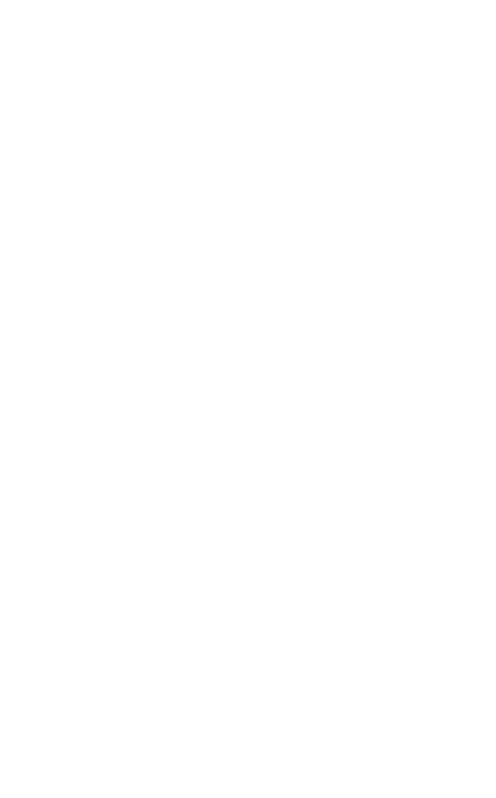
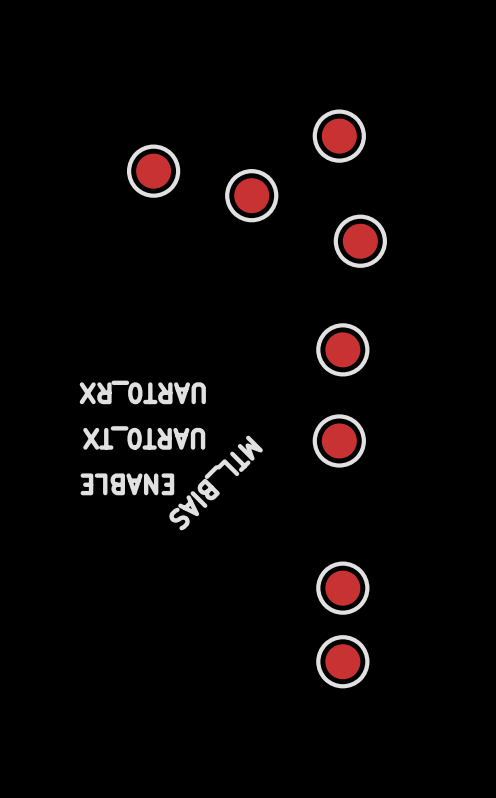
part: none -> (339, 136)
part: none -> (153, 171)
part: none -> (251, 195)
part: none -> (360, 241)
part: none -> (342, 349)
text: none -> UART0_RX (142, 392)
text: none -> UART0_TX (144, 437)
part: none -> (339, 440)
text: none -> MTL_BIAS (216, 483)
text: none -> ENABLE (127, 484)
part: none -> (342, 588)
part: none -> (342, 661)

